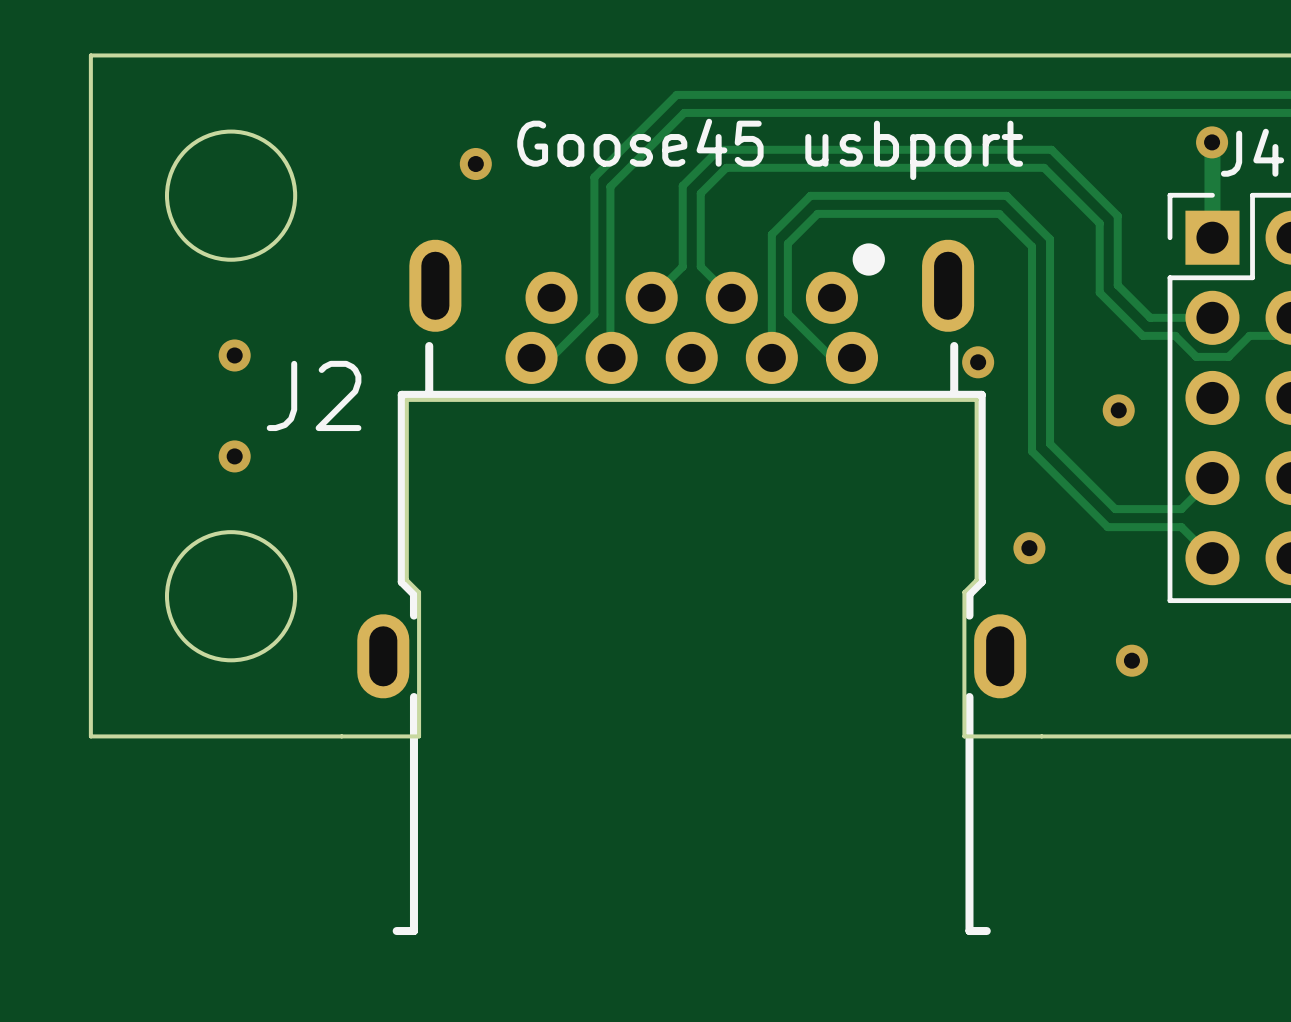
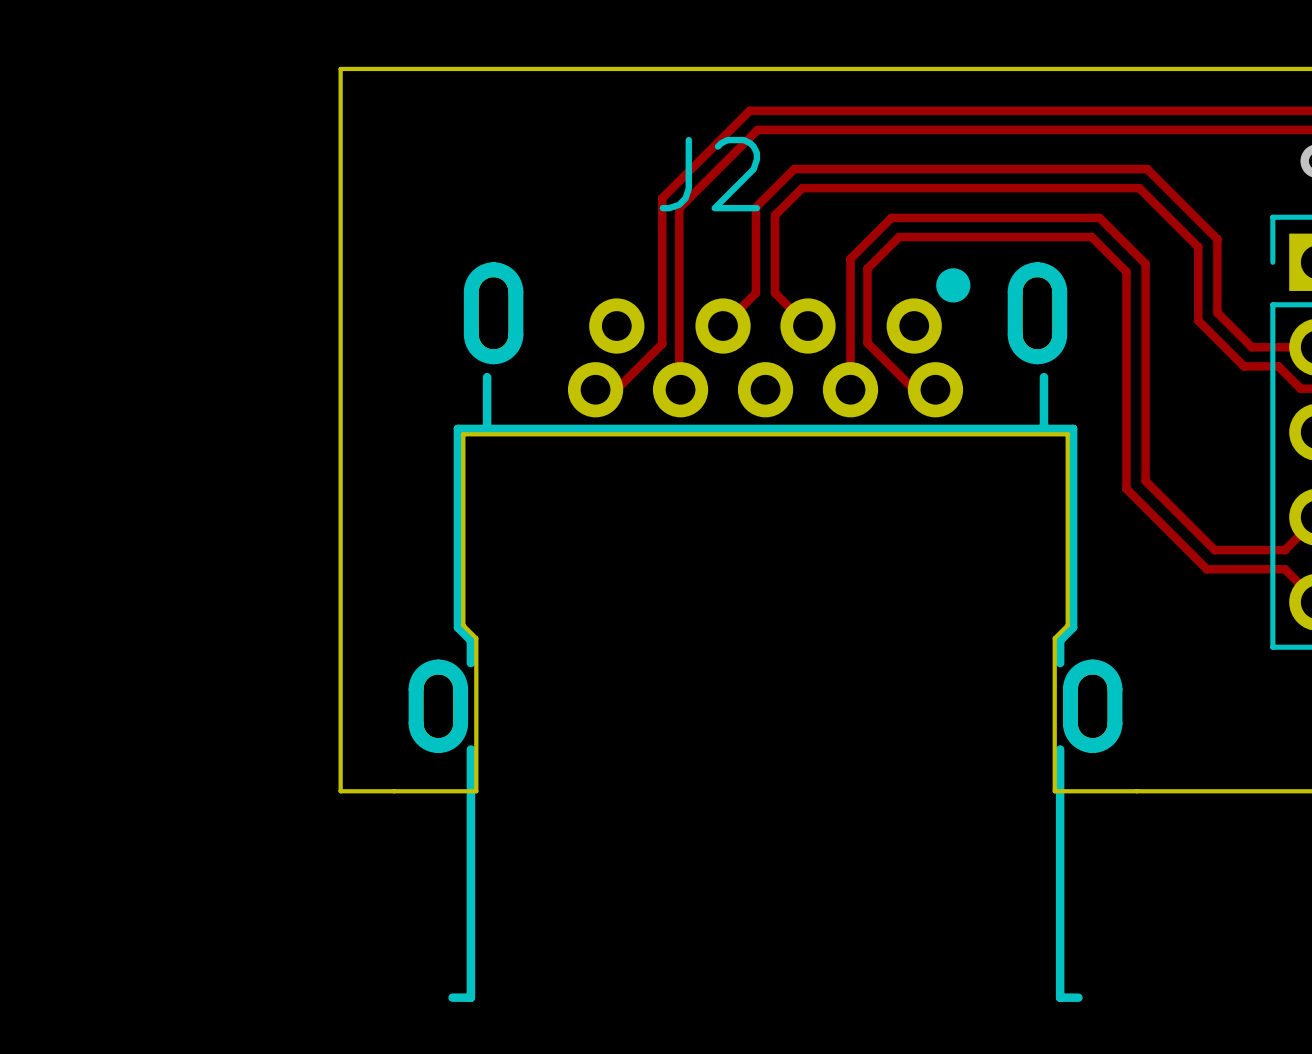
board edge: (291, 55) (90, 55) (90, 736) (291, 736) -> (340, 68) (340, 791)
round board edge: [164, 129, 298, 262] -> none
text: Goose45 usbport (770, 149) -> none
via: (475, 164) -> none
J2 footprint: [339, 239, 1044, 936] -> [392, 262, 1139, 1002]
via: (234, 355) -> none
via: (978, 362) -> none
J2 name position: J2 (314, 395) -> J2 (709, 174)
via: (1118, 410) -> none
via: (234, 456) -> none
round board edge: [164, 530, 298, 663] -> none
via: (1029, 548) -> none
via: (1131, 660) -> none

